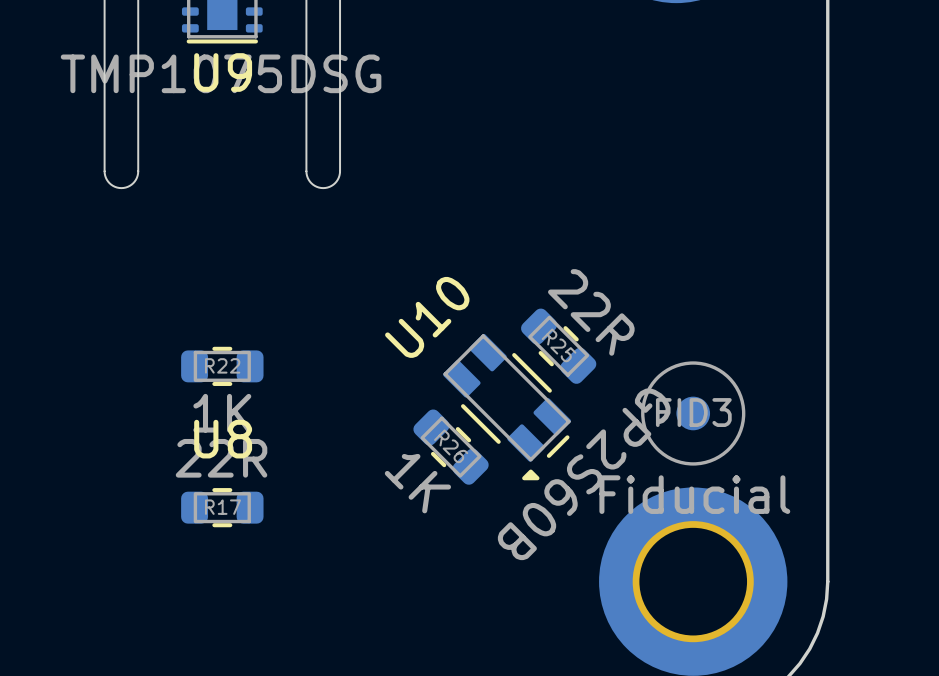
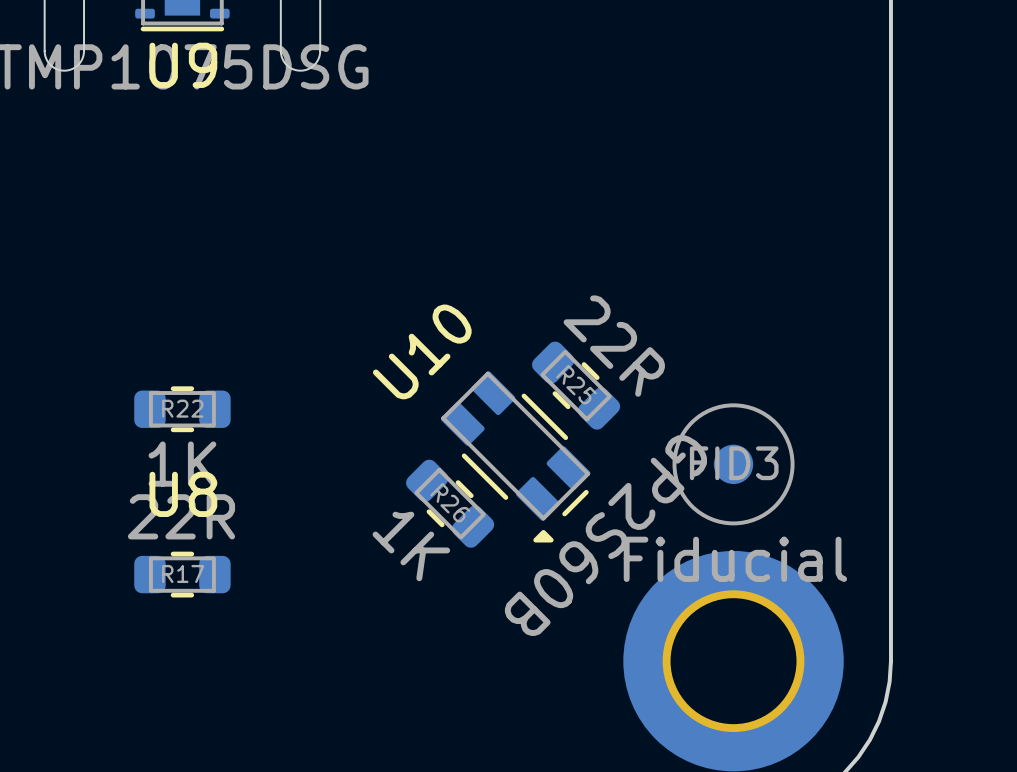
board edge: (138, 60) (138, 173) (131, 184) (121, 188) (111, 184) (104, 173) (104, 60) -> (84, 51) (78, 64) (64, 70) (50, 64) (44, 51)
board edge: (340, 60) (339, 173) (333, 184) (323, 188) (312, 184) (306, 173) (306, 60) -> (320, 51) (314, 64) (300, 70) (286, 64) (280, 51)

